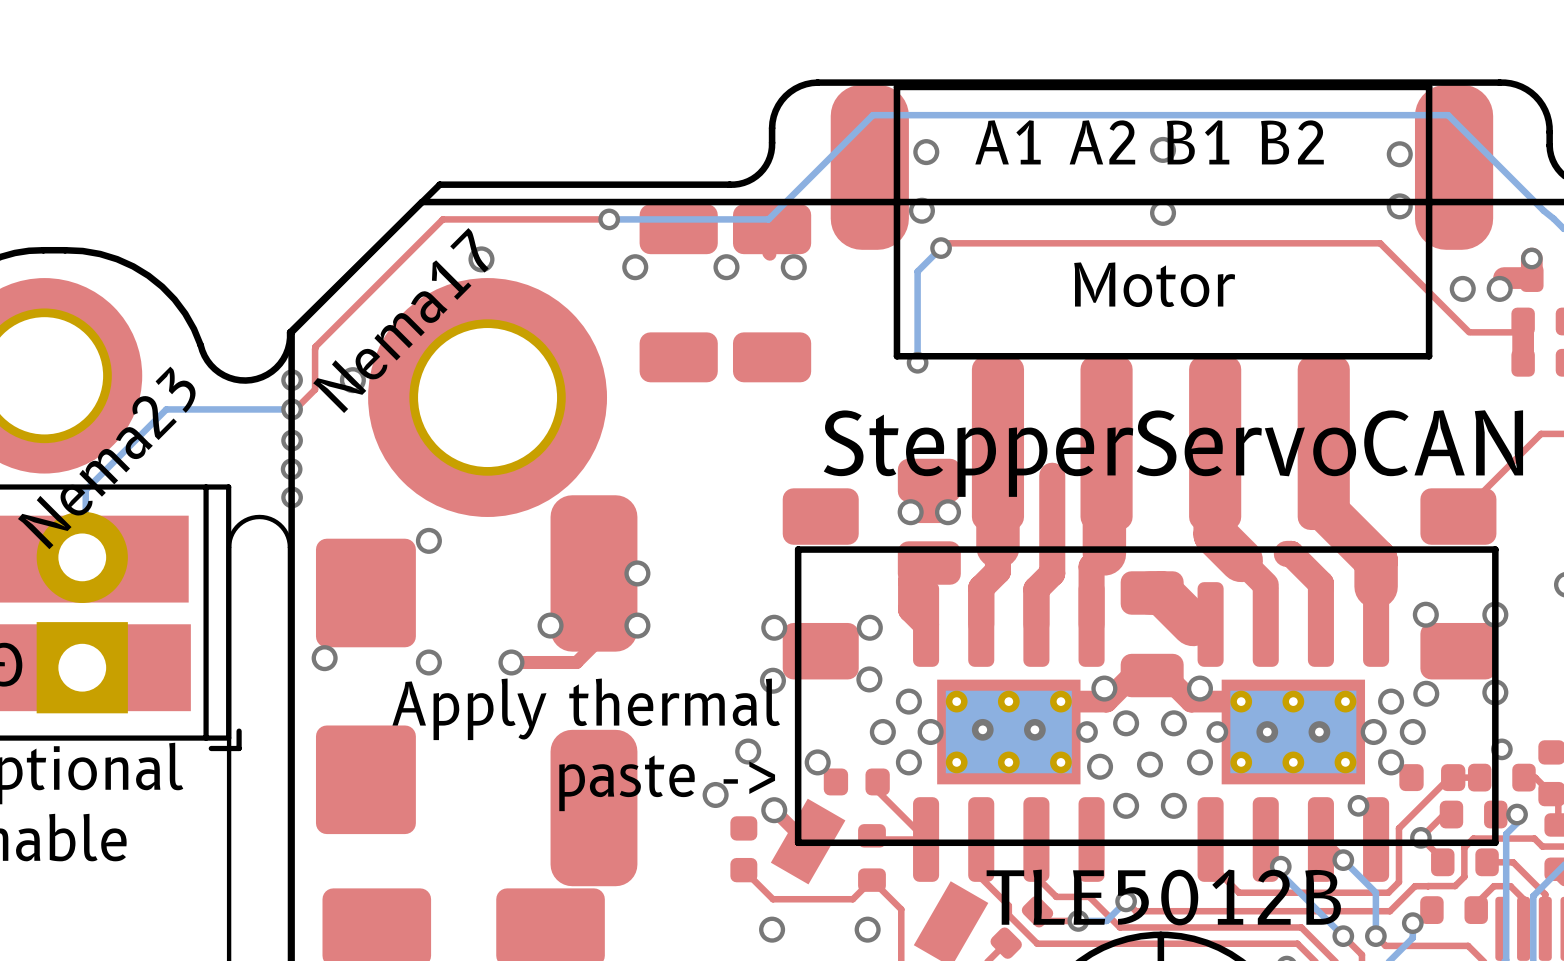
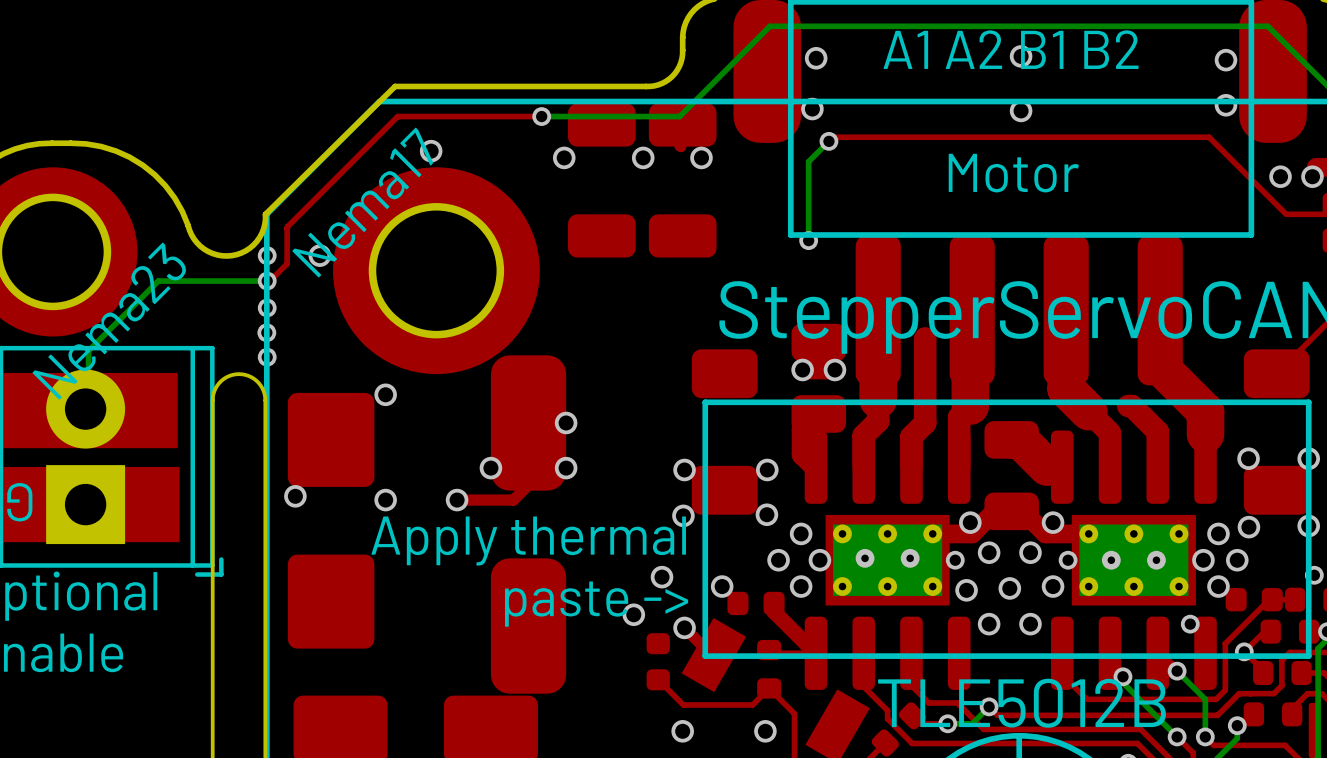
top track width: thin (877, 791) (926, 839) -> thick (774, 611) (815, 653)

